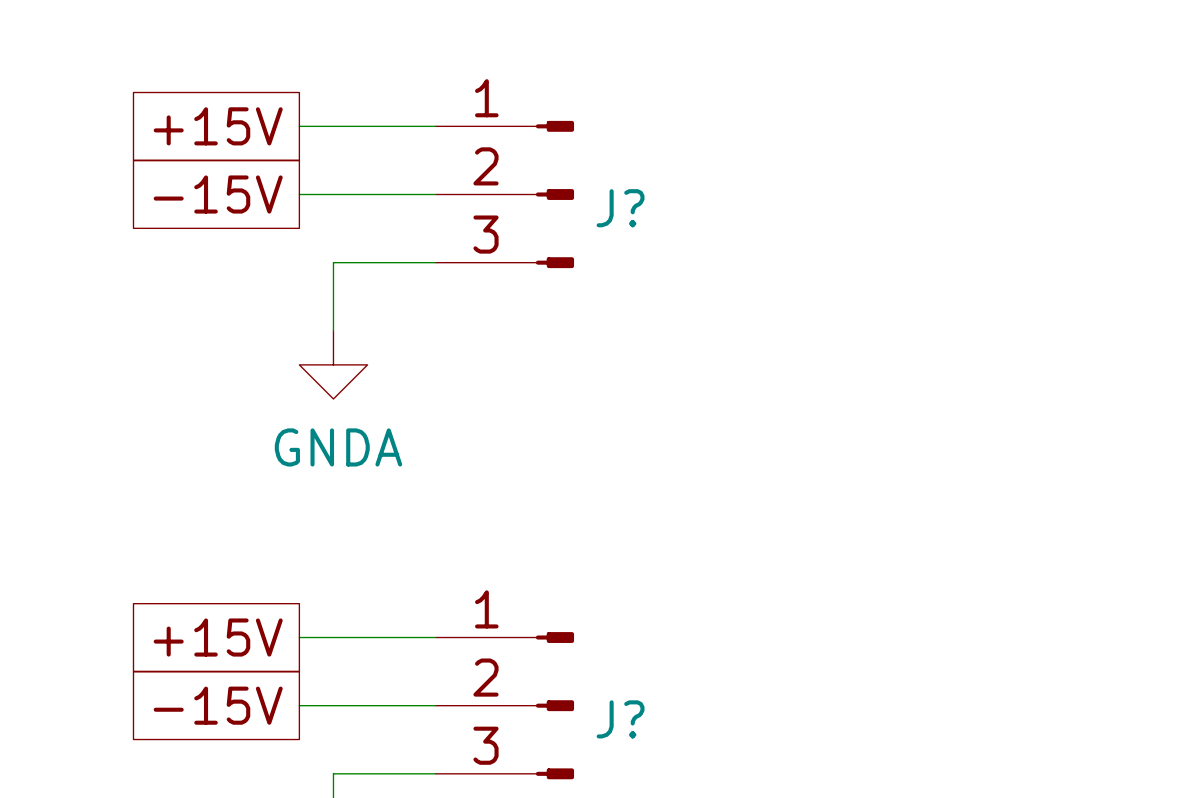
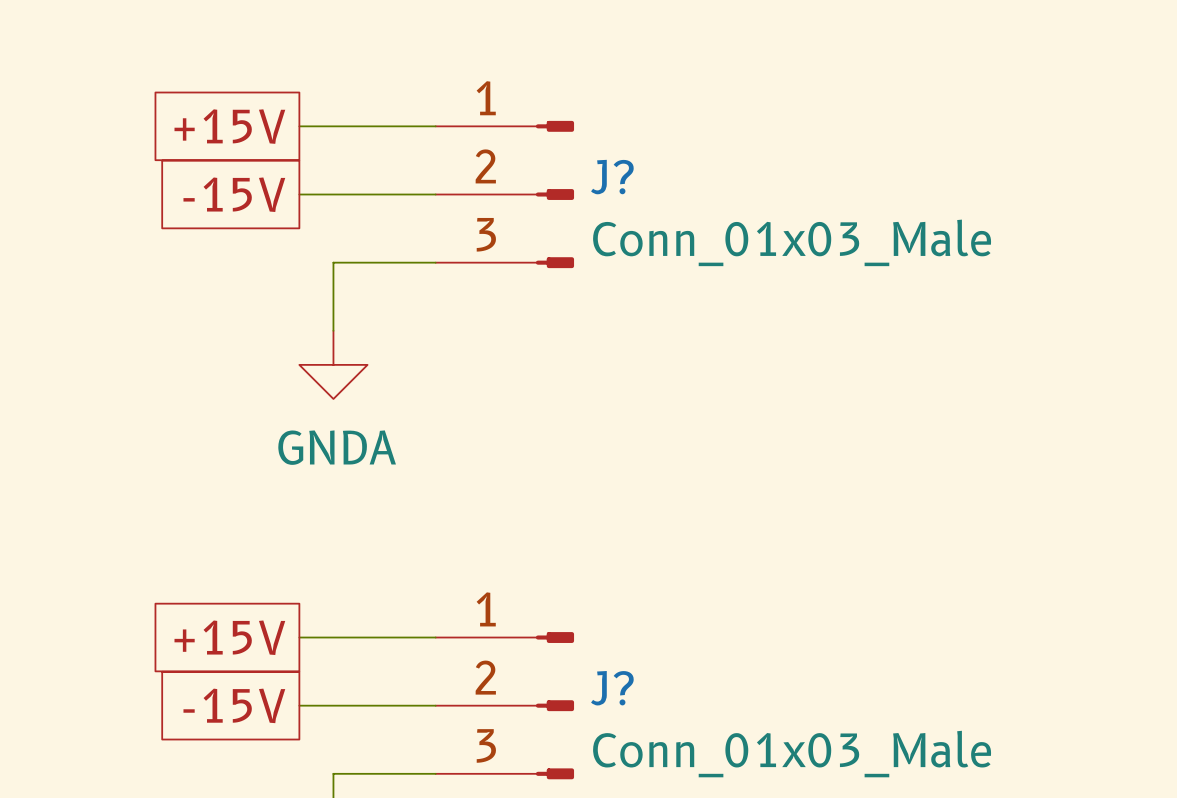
J? name position: J? (620, 208) -> J? (612, 177)
J? value: none -> Conn_01x03_Male (792, 242)
J? name position: J? (620, 719) -> J? (612, 688)
J? value: none -> Conn_01x03_Male (792, 754)

